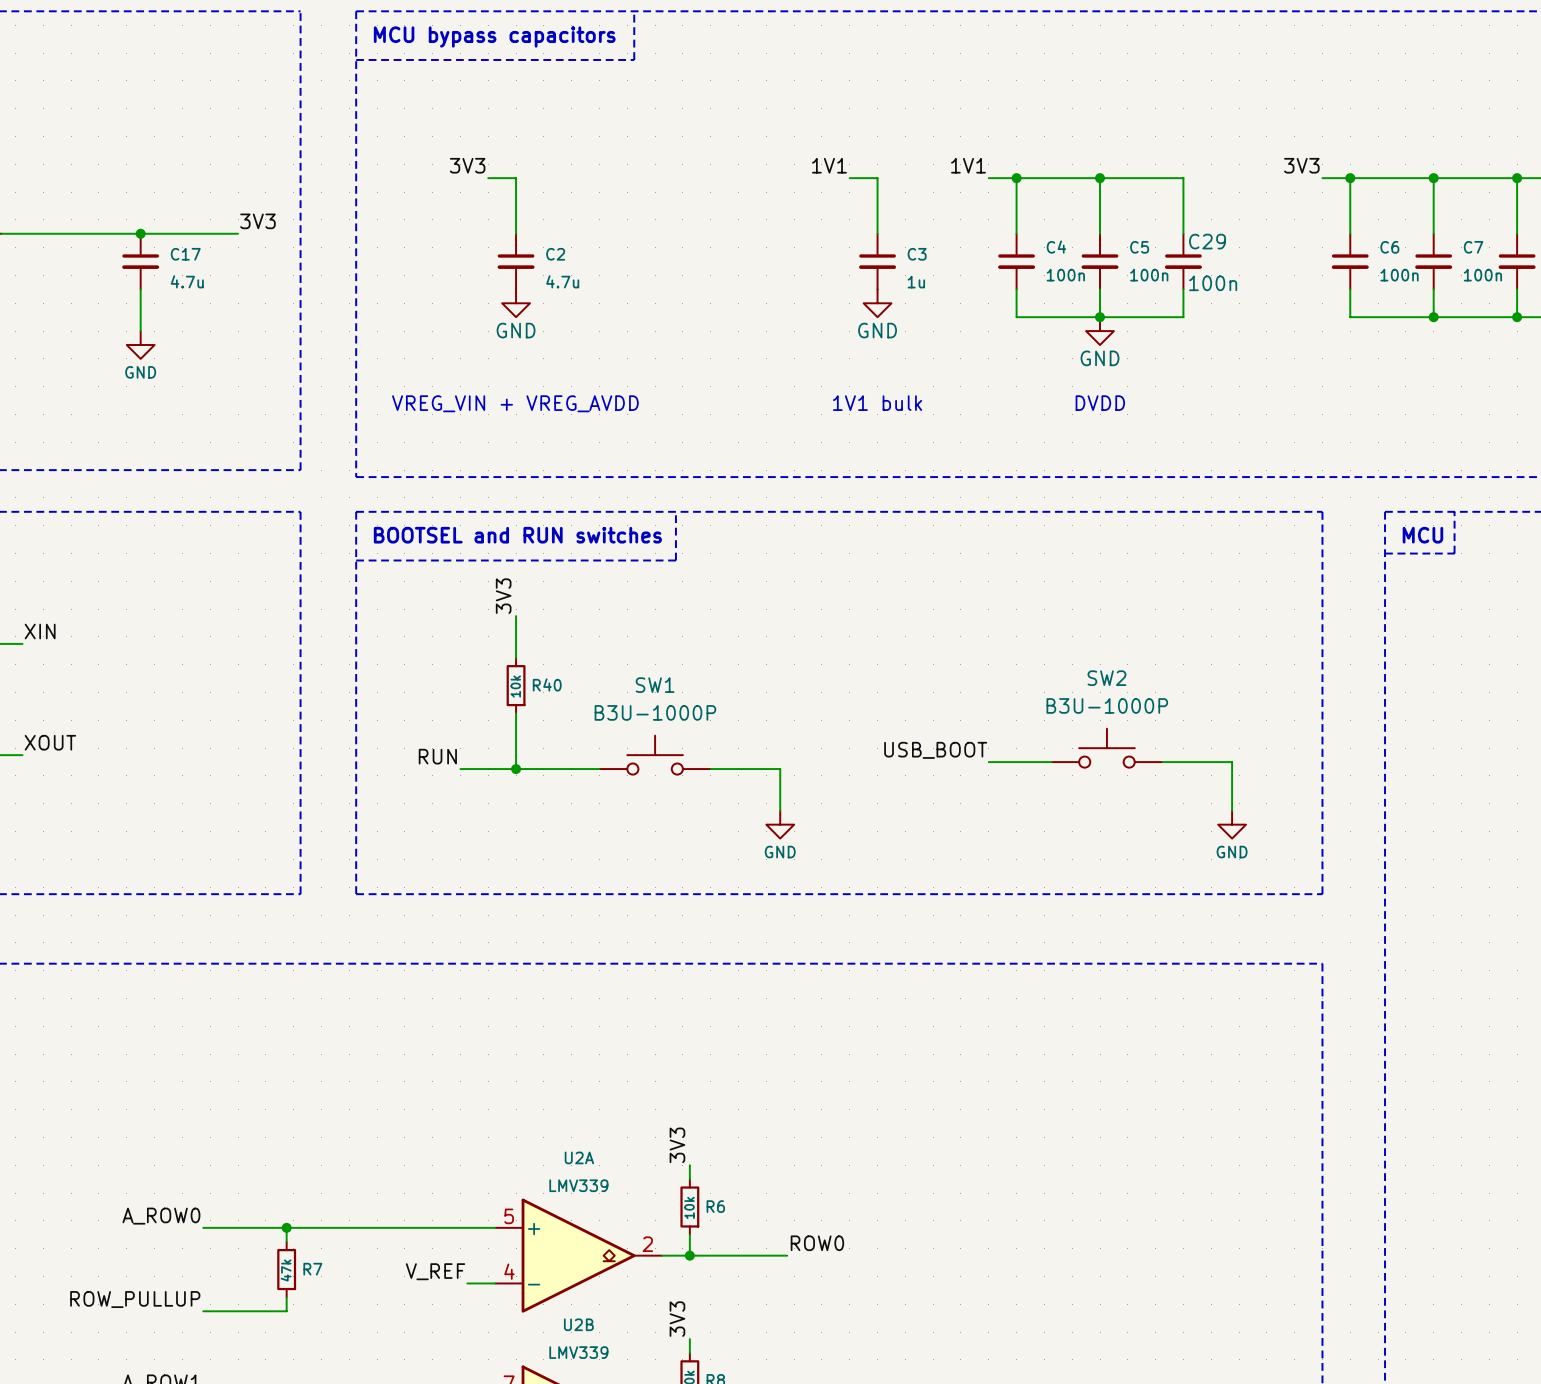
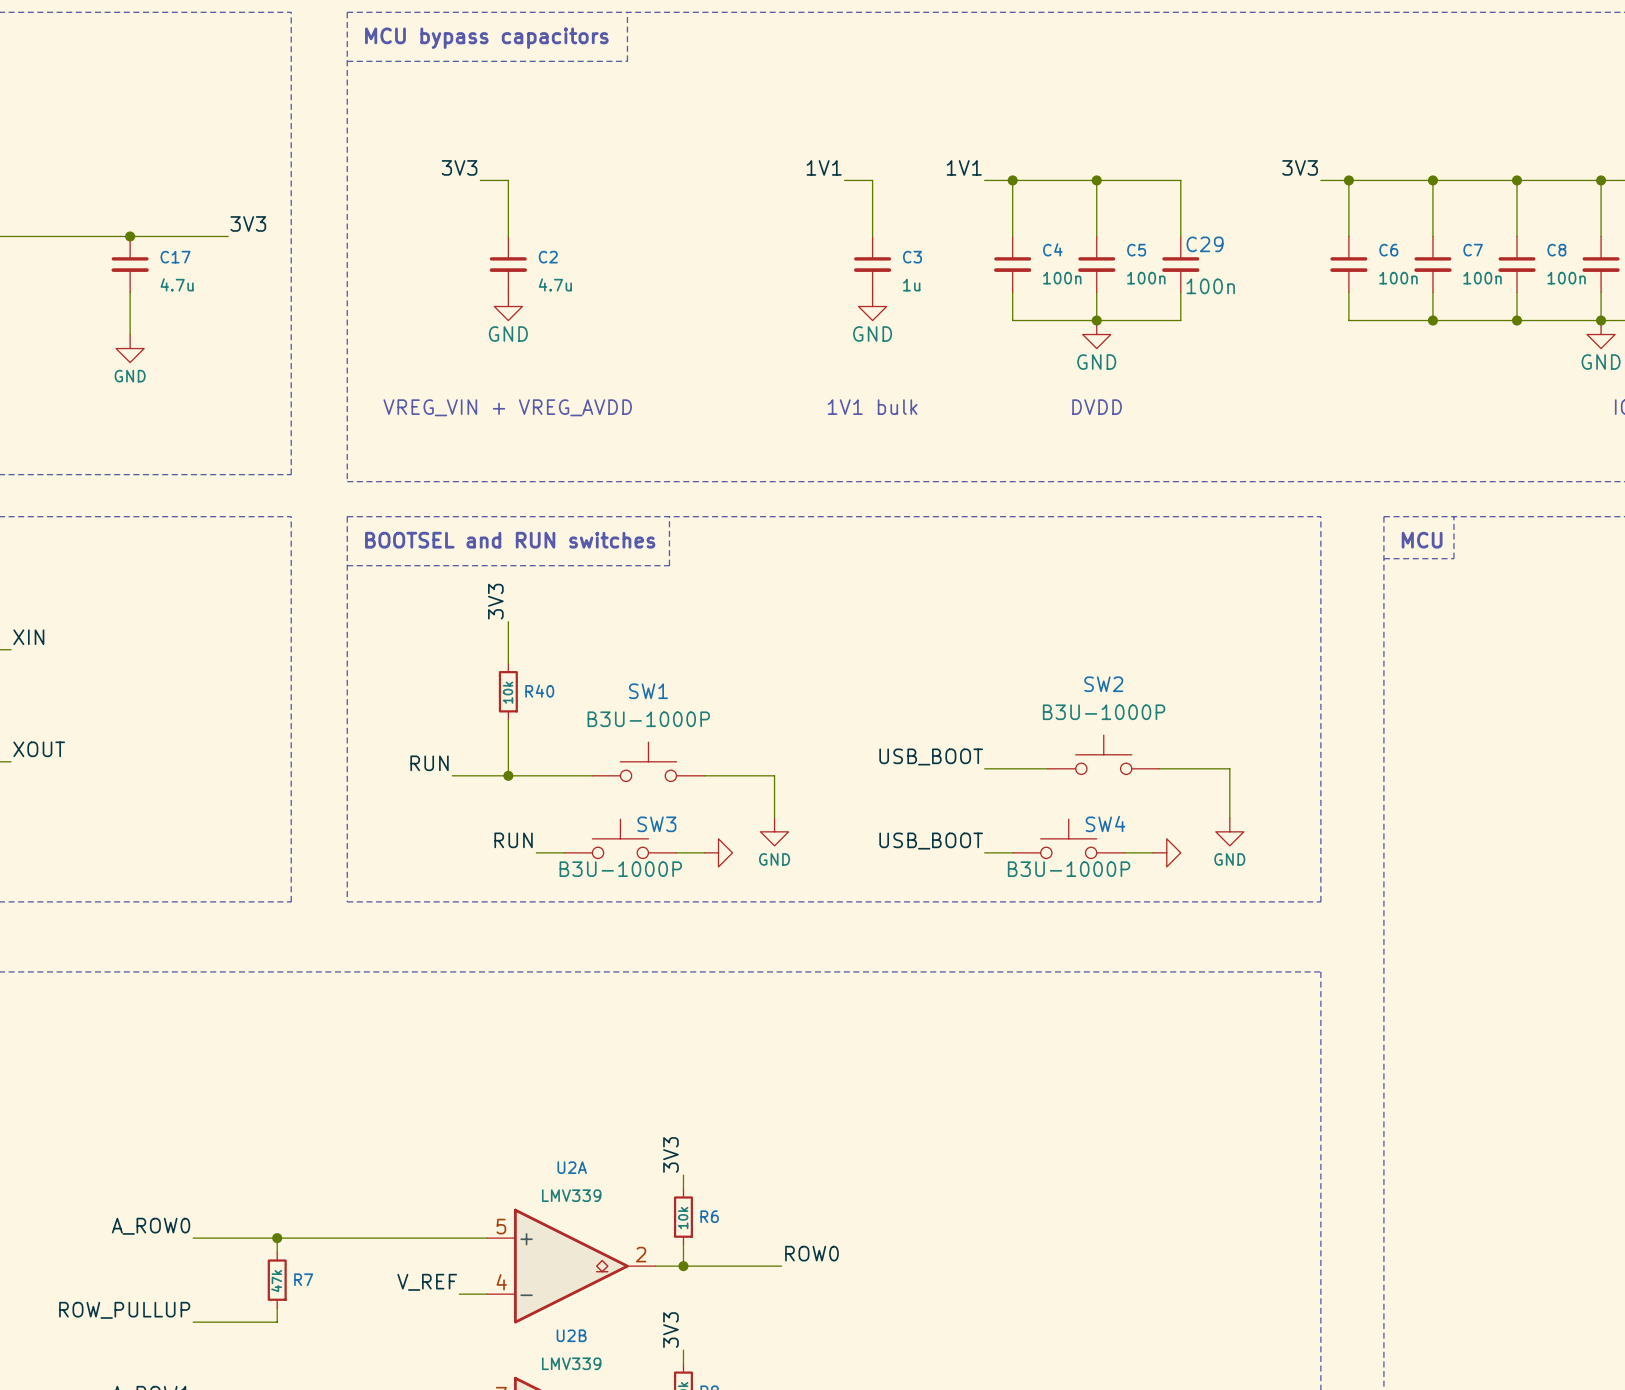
SW3: none -> B3U-1000P (620, 838)
SW4: none -> B3U-1000P (1068, 838)
label: none -> RUN (513, 840)
label: none -> USB_BOOT (931, 841)
wire: none -> (536, 852) (564, 852)
wire: none -> (676, 852) (704, 852)
power symbol: none -> (718, 852)
wire: none -> (984, 852) (1012, 852)
wire: none -> (1124, 852) (1152, 852)
power symbol: none -> (1166, 852)

